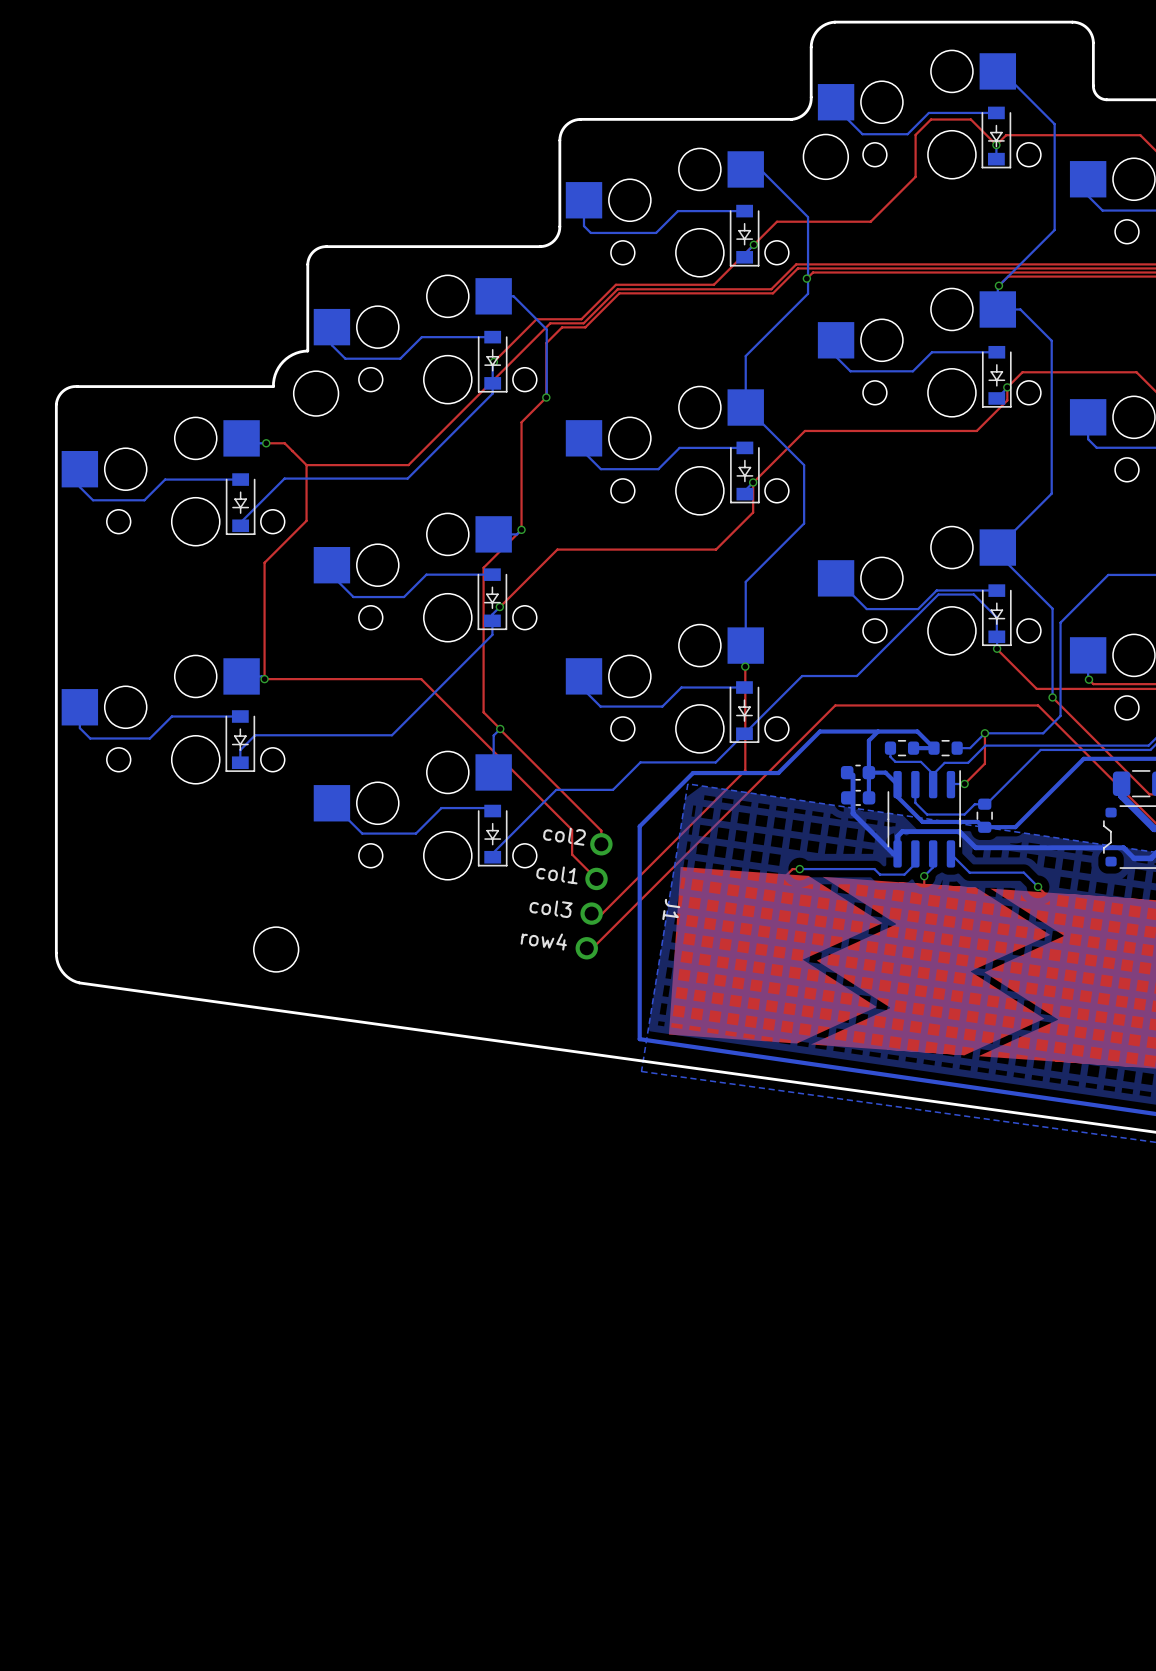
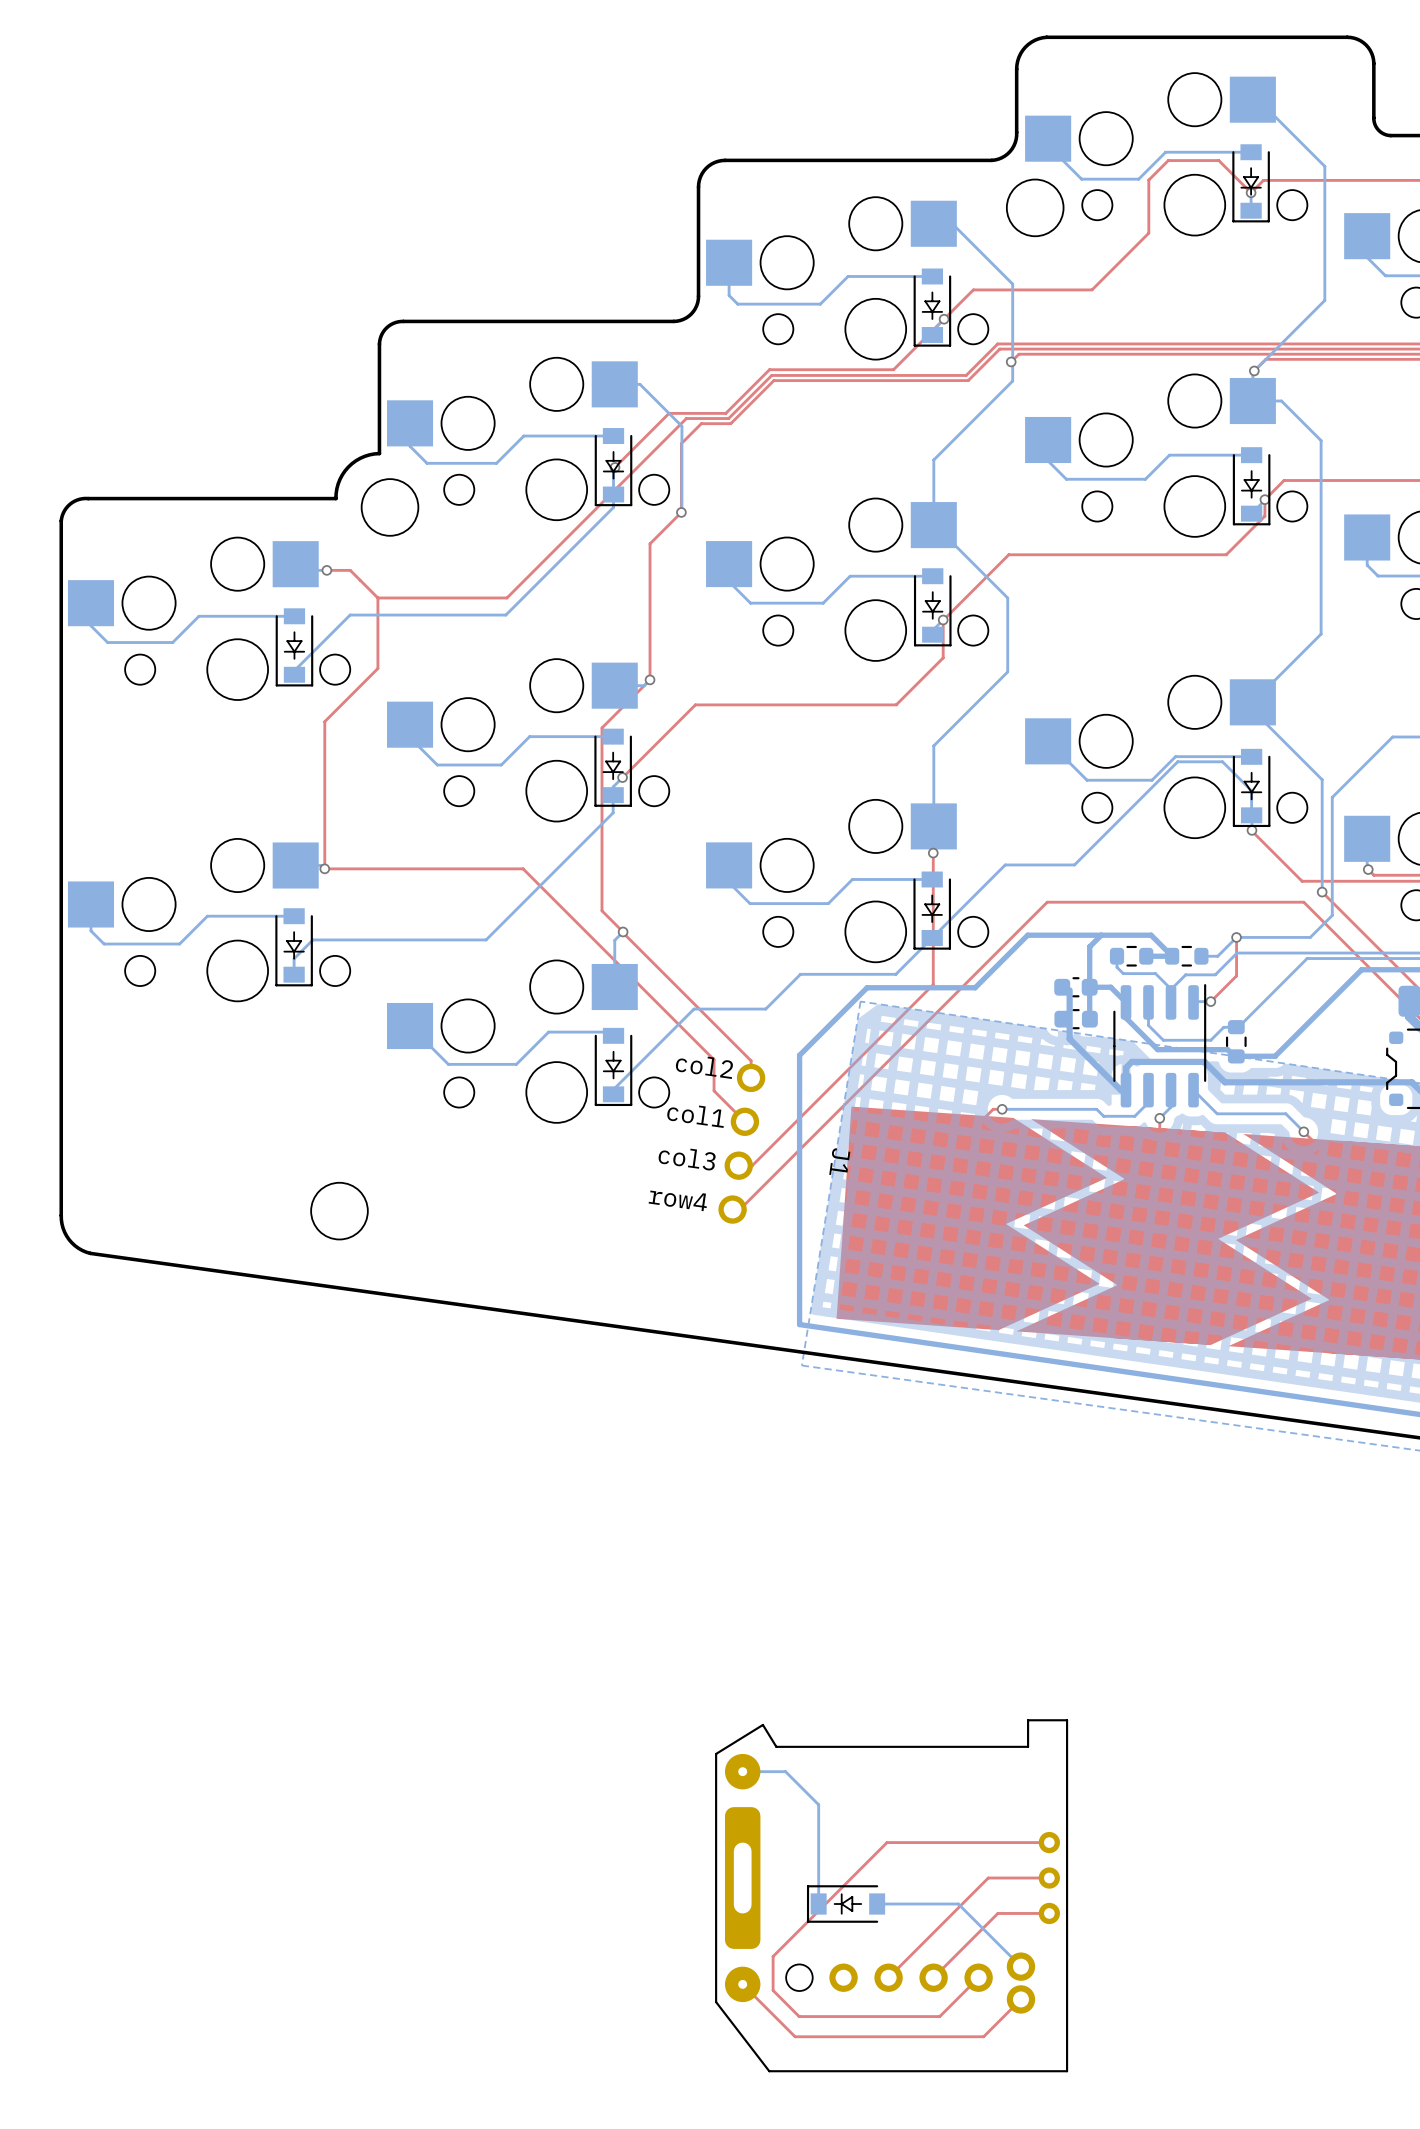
bottom track: none -> (742, 1771) (785, 1771) (818, 1804) (818, 1904)
top track: none -> (1049, 1842) (887, 1842) (773, 1956) (773, 1990) (799, 2016) (939, 2016) (978, 1977)
top track: none -> (1049, 1878) (988, 1878) (888, 1977)
part: none -> (891, 1895)
part: none -> (846, 1904)
bottom track: none -> (877, 1904) (958, 1904) (1020, 1966)
top track: none -> (1049, 1913) (997, 1913) (933, 1977)
part: none -> (910, 1983)
top track: none -> (742, 1984) (795, 2036) (983, 2036) (1020, 1999)

